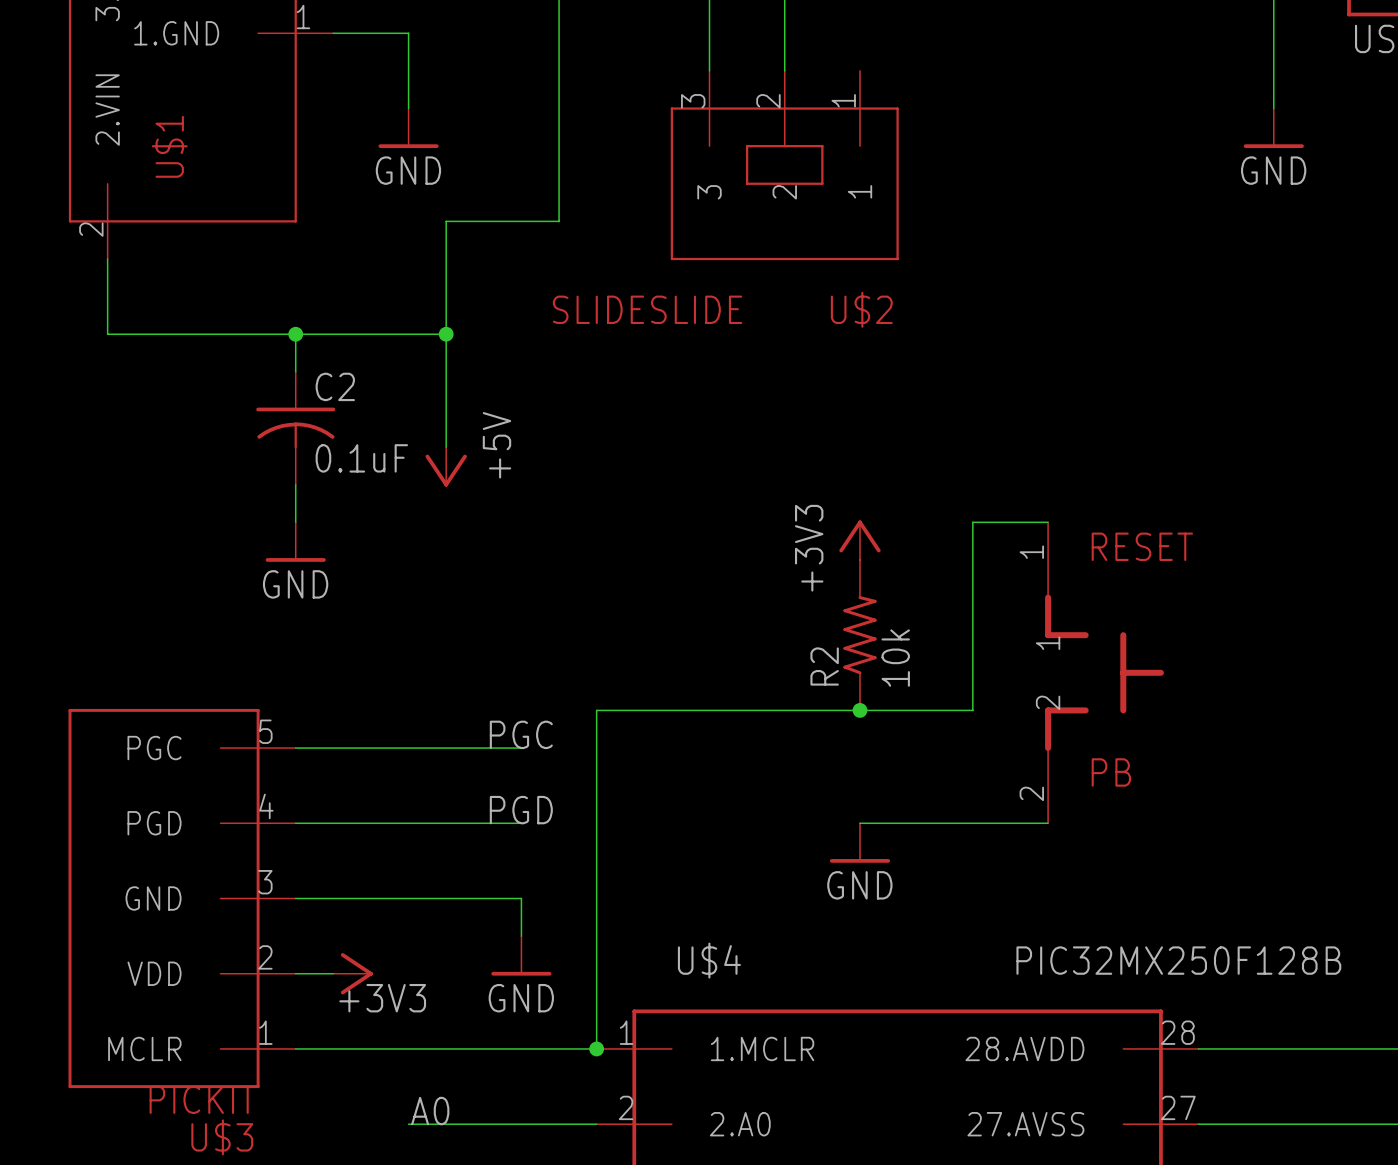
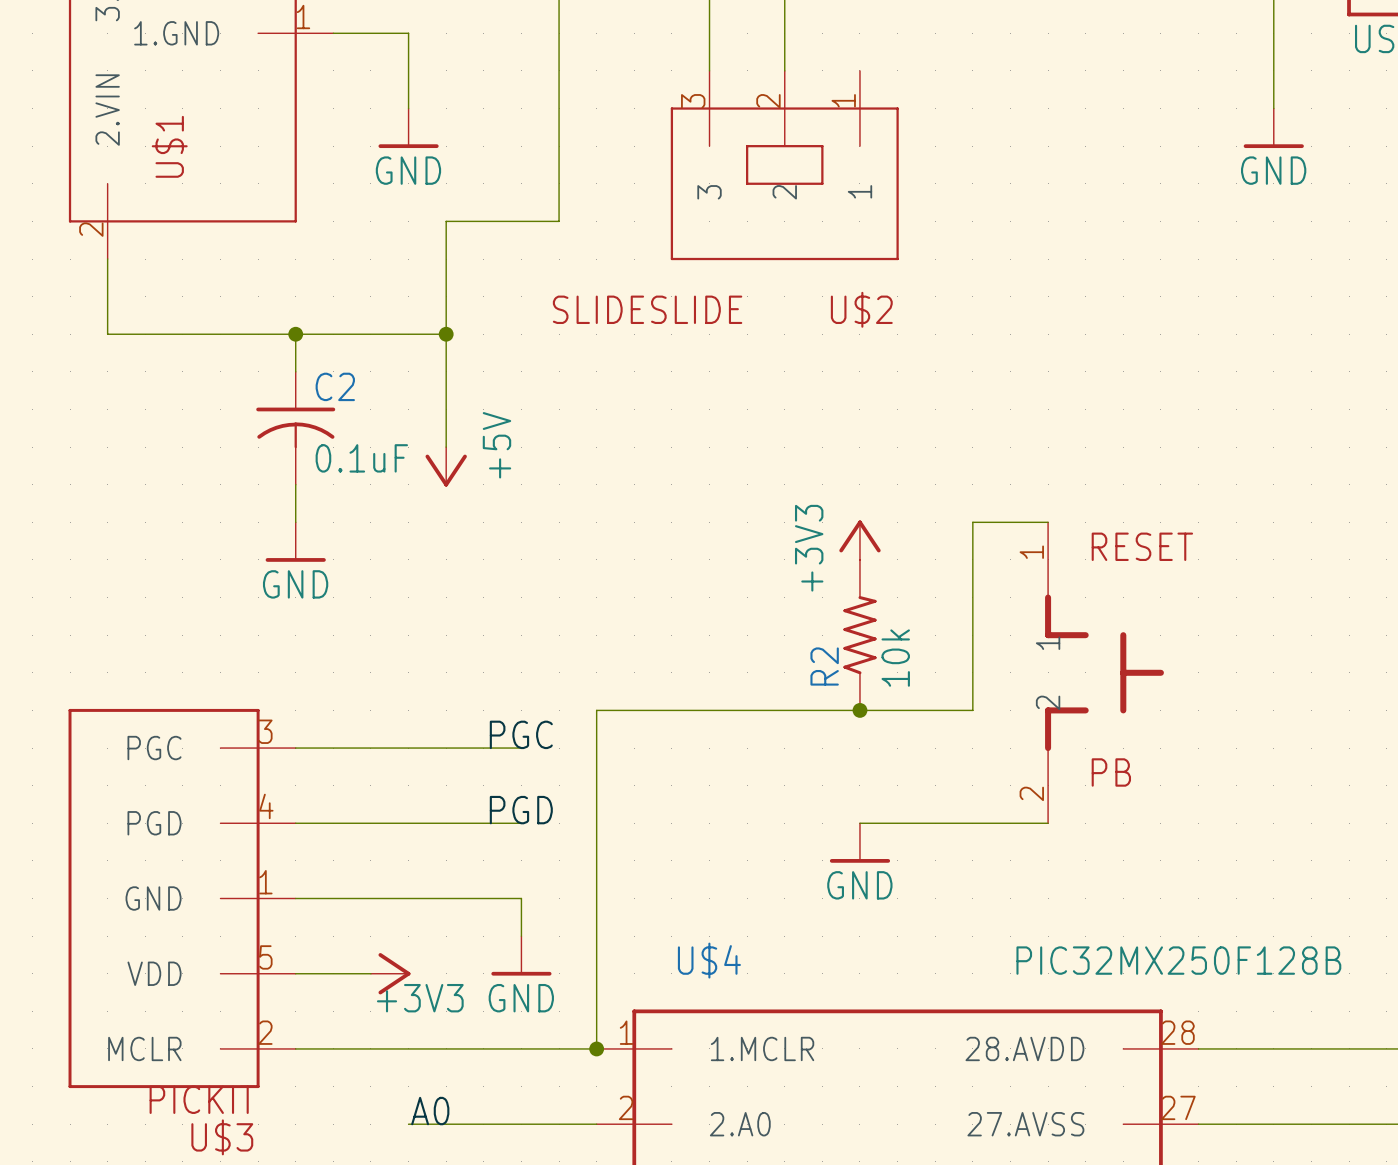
U$3 pin number: 5 (265, 731) -> 3 (265, 731)
U$3 pin number: 3 (265, 882) -> 1 (265, 882)
U$3 pin number: 2 (265, 957) -> 5 (265, 957)
power symbol position: +3V3 (353, 973) -> +3V3 (390, 973)
U$3 pin number: 1 (265, 1032) -> 2 (265, 1032)

